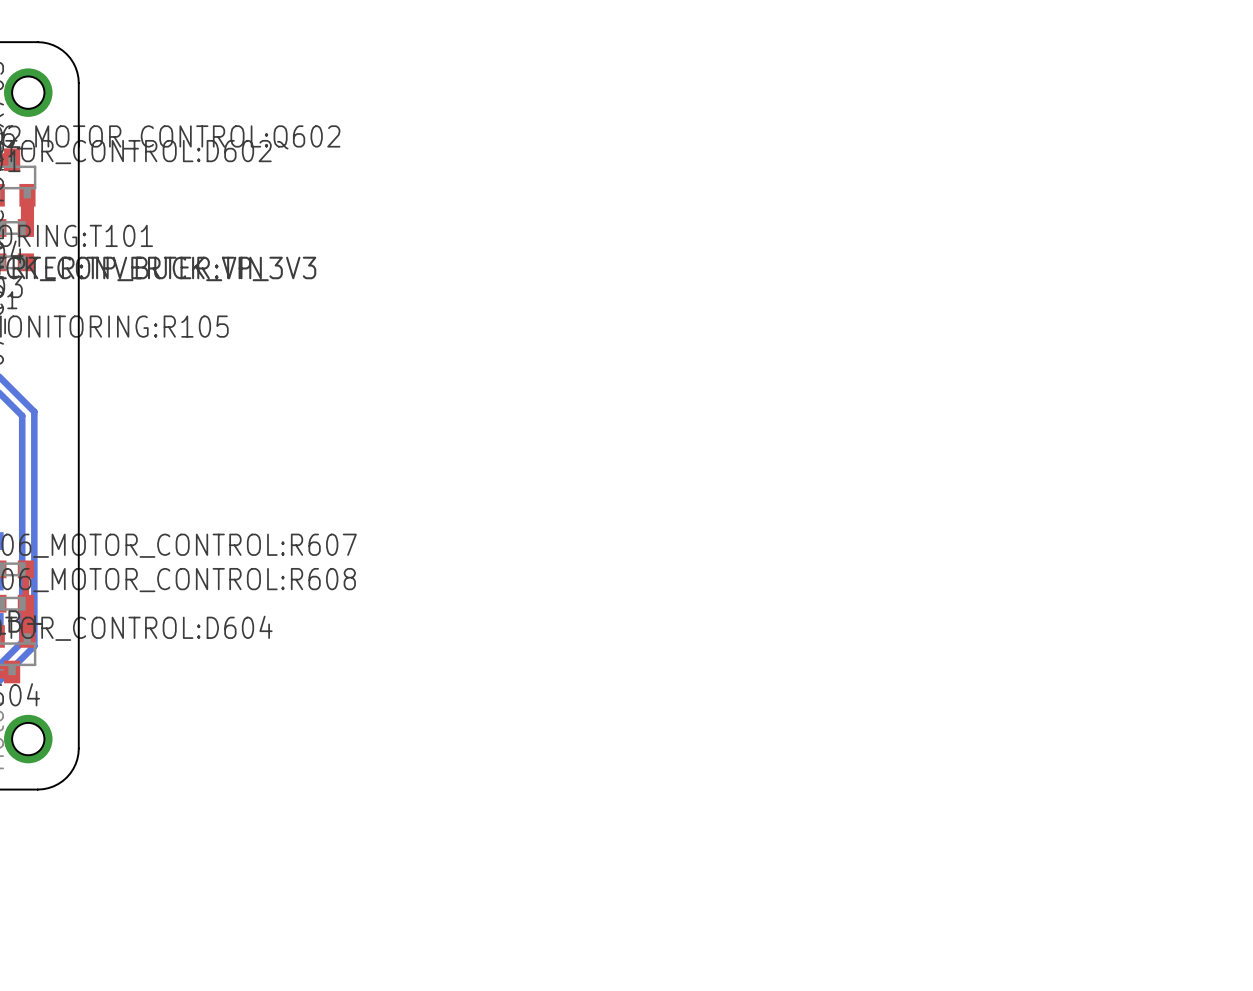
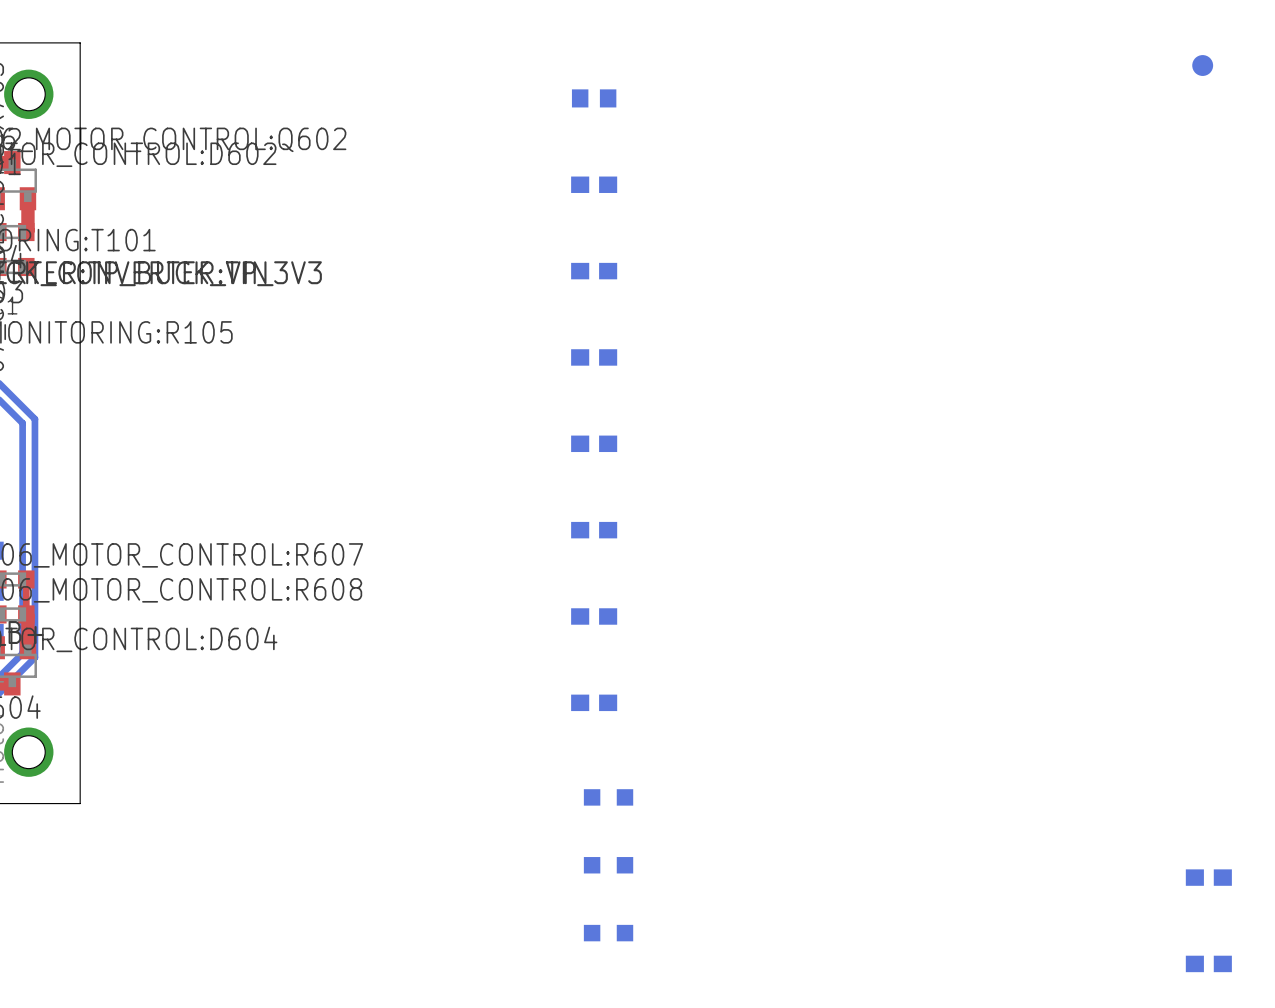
board edge: (37, 42) (53, 45) (66, 54) (75, 67) (78, 83) -> (38, 42) (80, 42) (80, 84)
part: none -> (1202, 65)
part: none -> (594, 98)
part: none -> (594, 184)
part: none -> (594, 271)
part: none -> (594, 357)
part: none -> (594, 443)
part: none -> (594, 530)
part: none -> (594, 616)
part: none -> (594, 702)
board edge: (78, 748) (75, 764) (66, 777) (53, 786) (37, 789) -> (80, 761) (80, 803) (38, 803)
part: none -> (608, 797)
part: none -> (608, 865)
part: none -> (1208, 877)
part: none -> (608, 933)
part: none -> (1208, 963)

